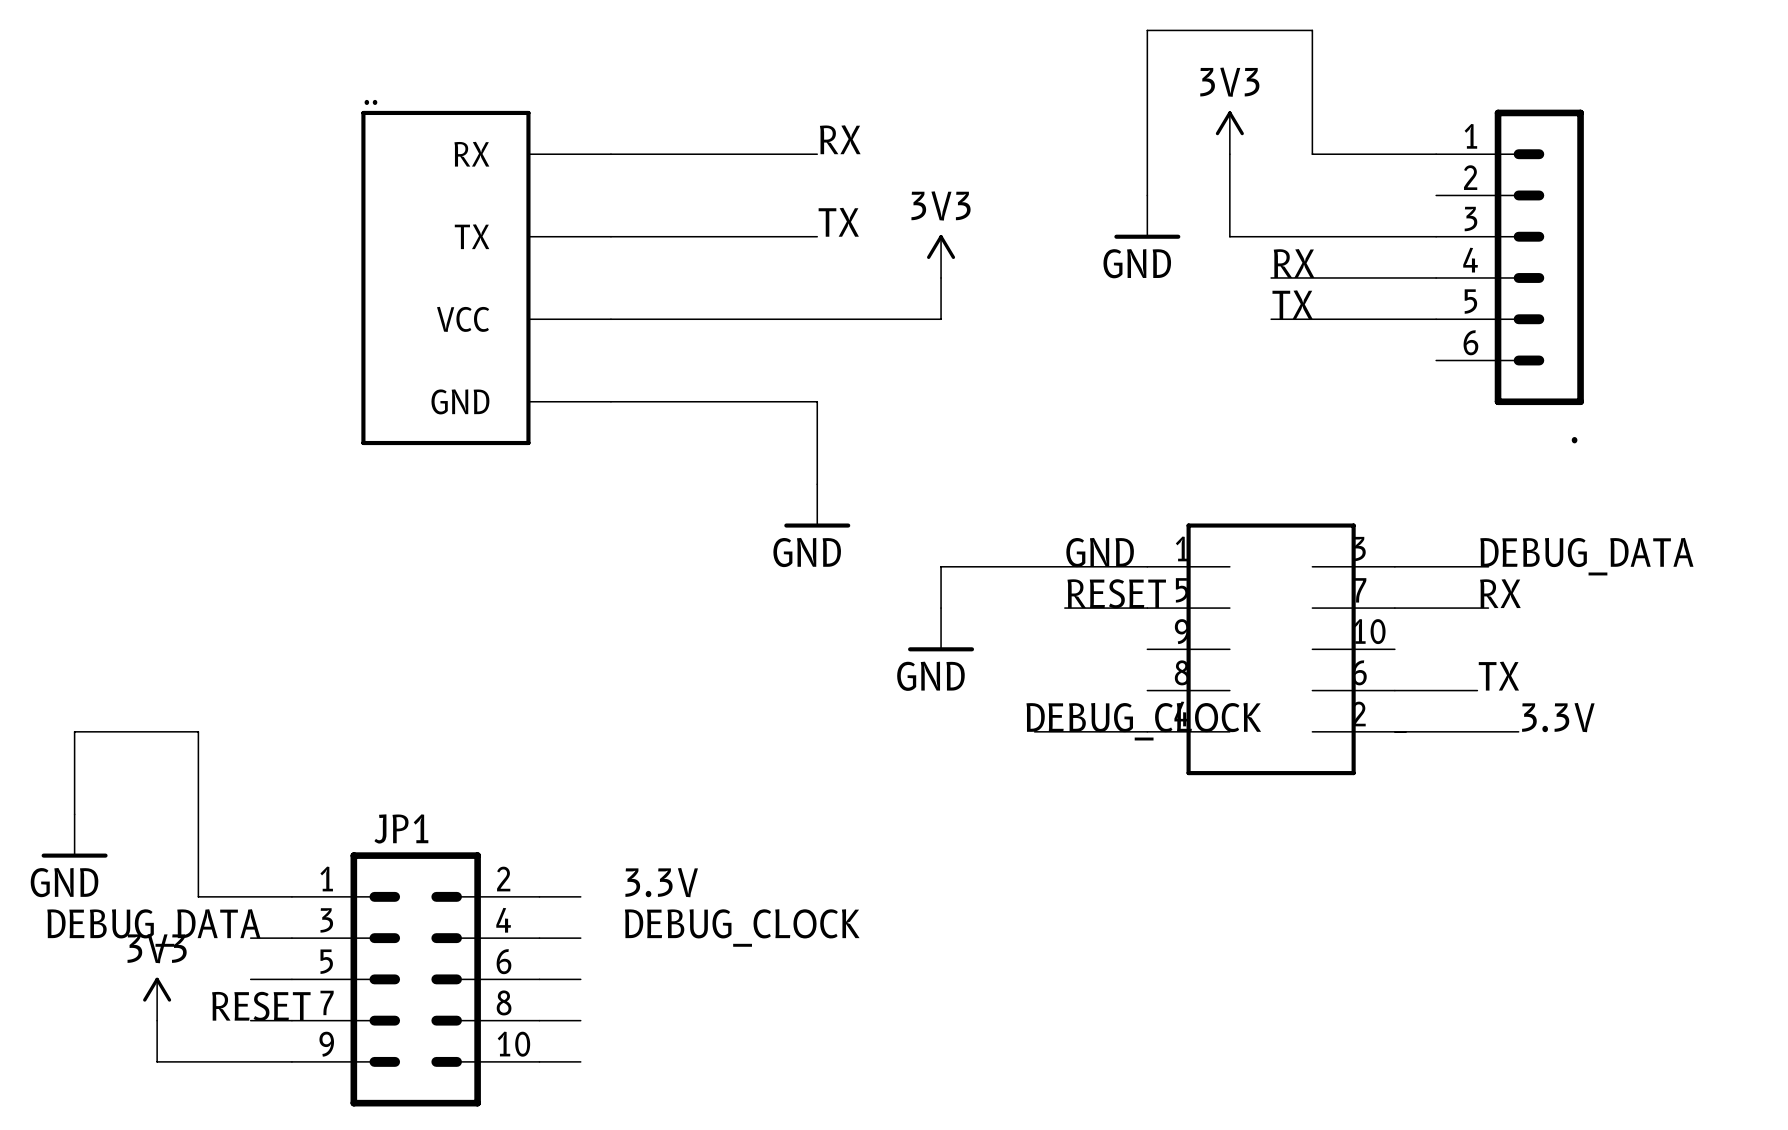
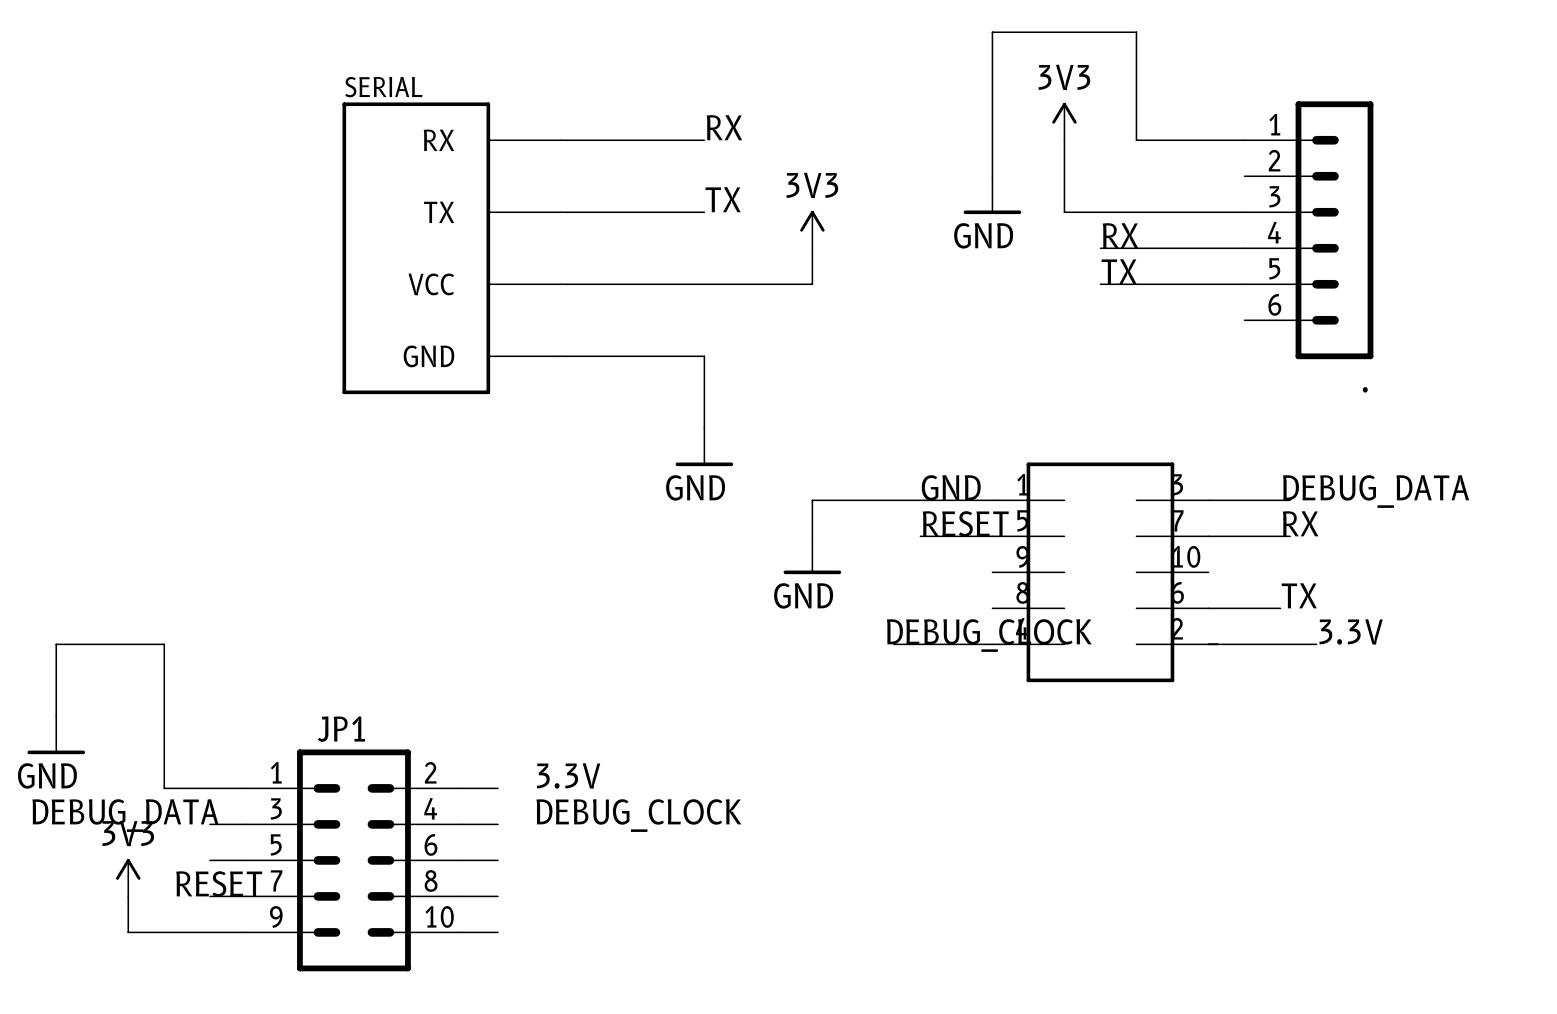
part: (486, 277) -> none
SERIAL: none -> (451, 248)

